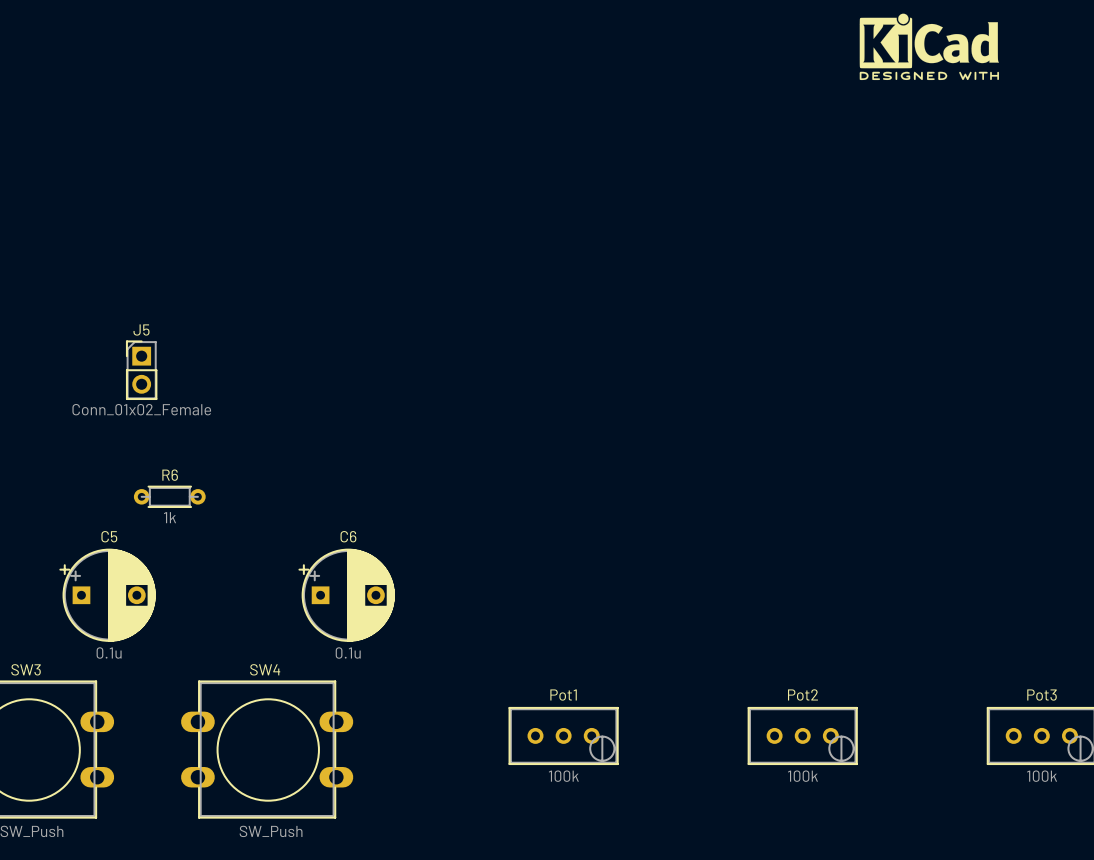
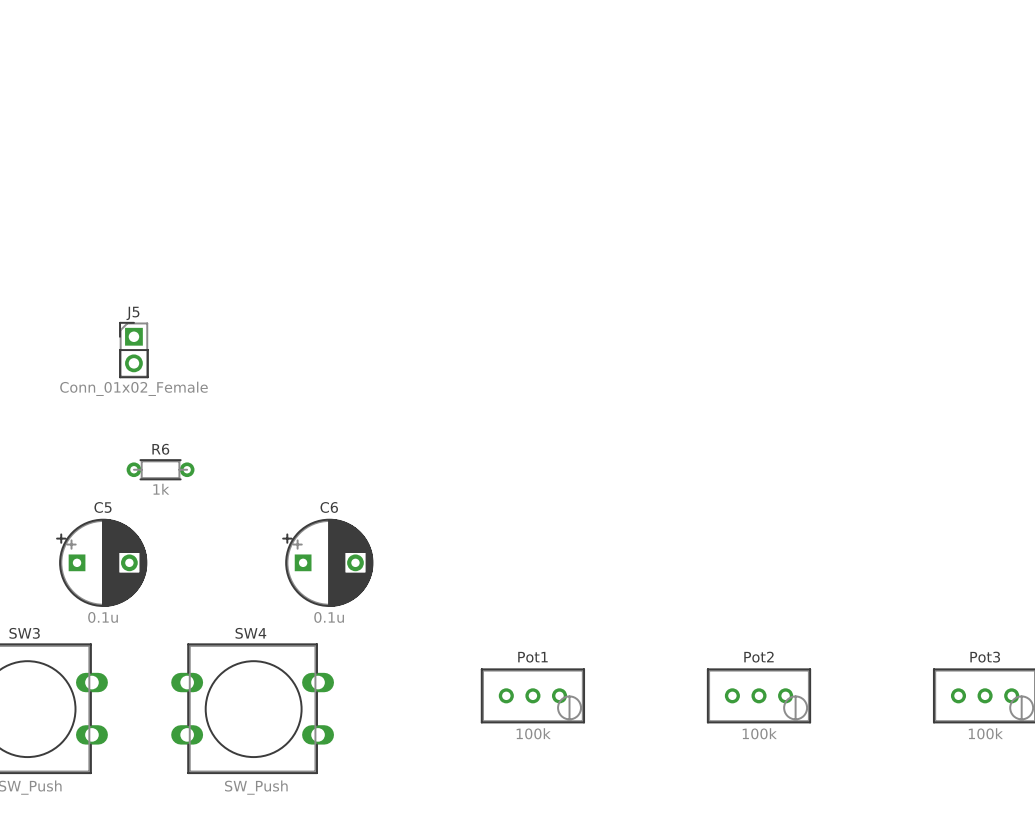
drawing: [859, 13, 1000, 81] -> none

